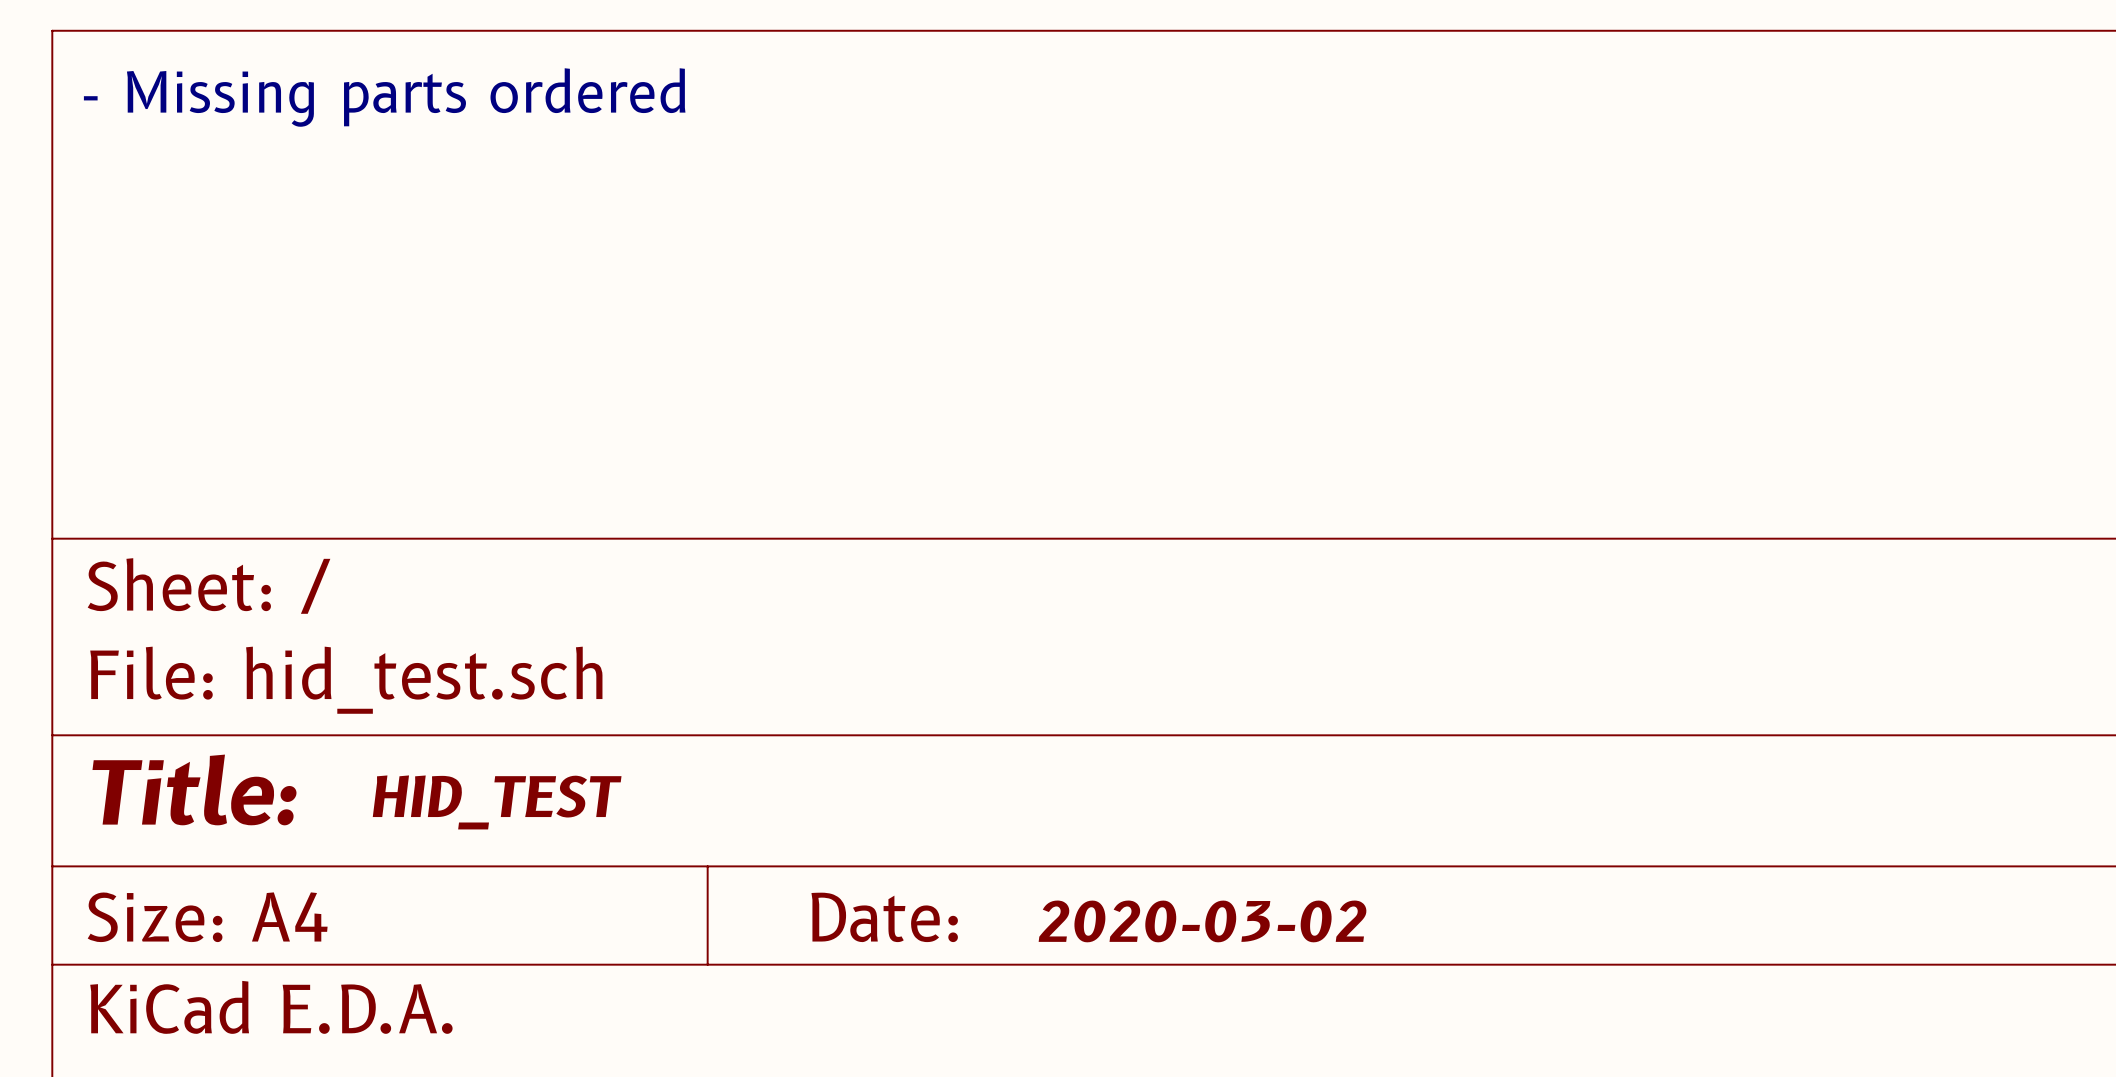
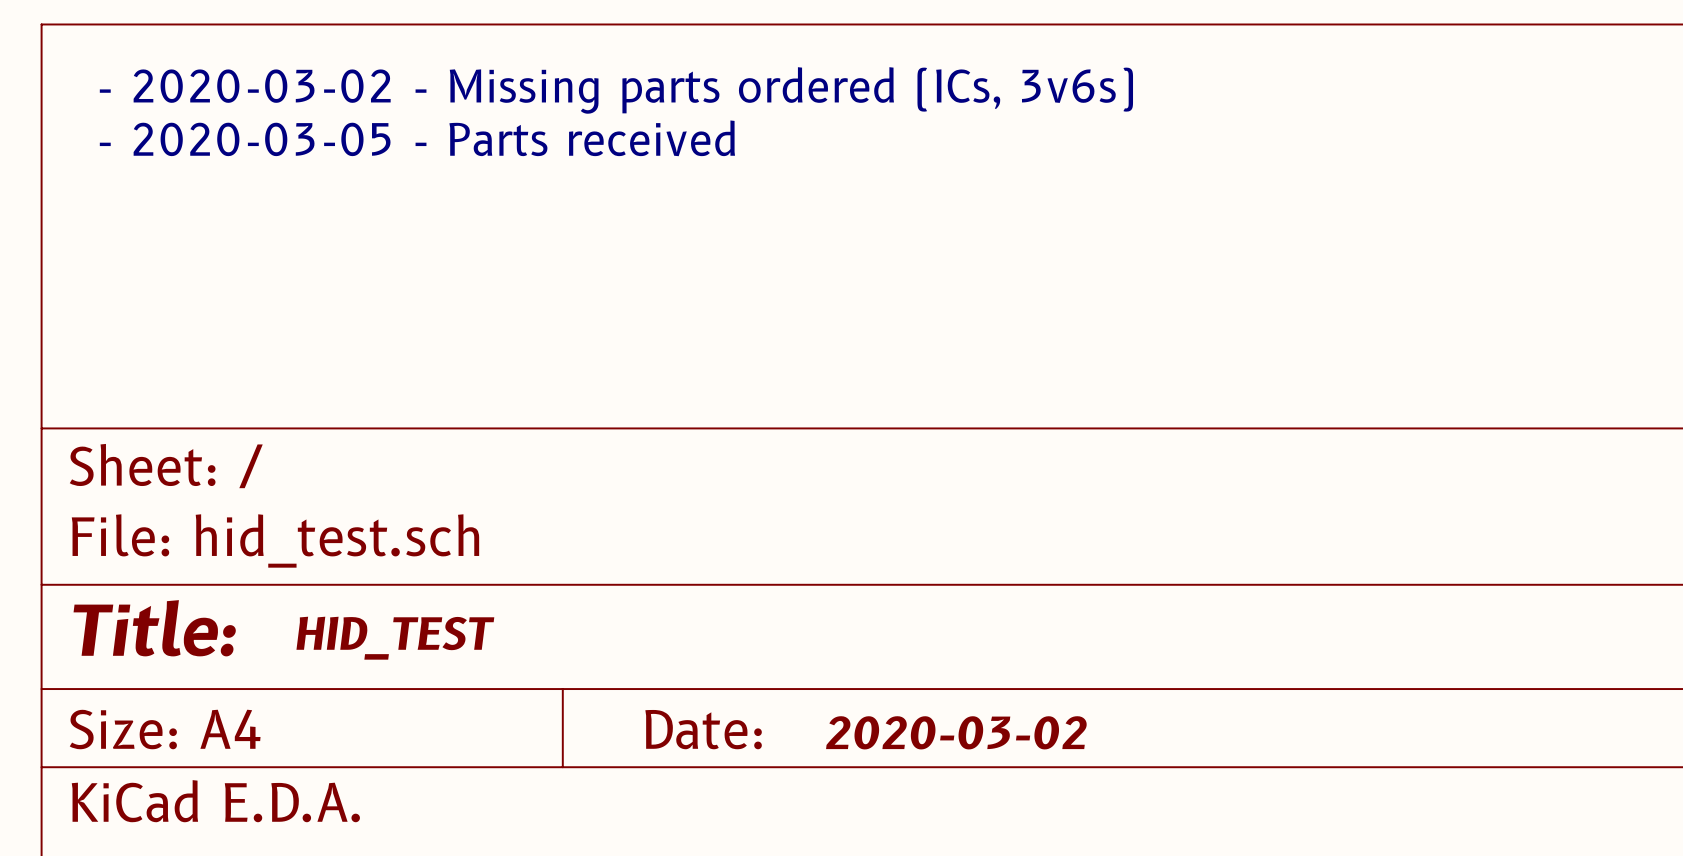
text: - Missing parts ordered (384, 97) -> - 2020-03-02 - Missing parts ordered (ICs, 3v6s) (616, 90)
text: none -> - 2020-03-05 - Parts received (417, 138)

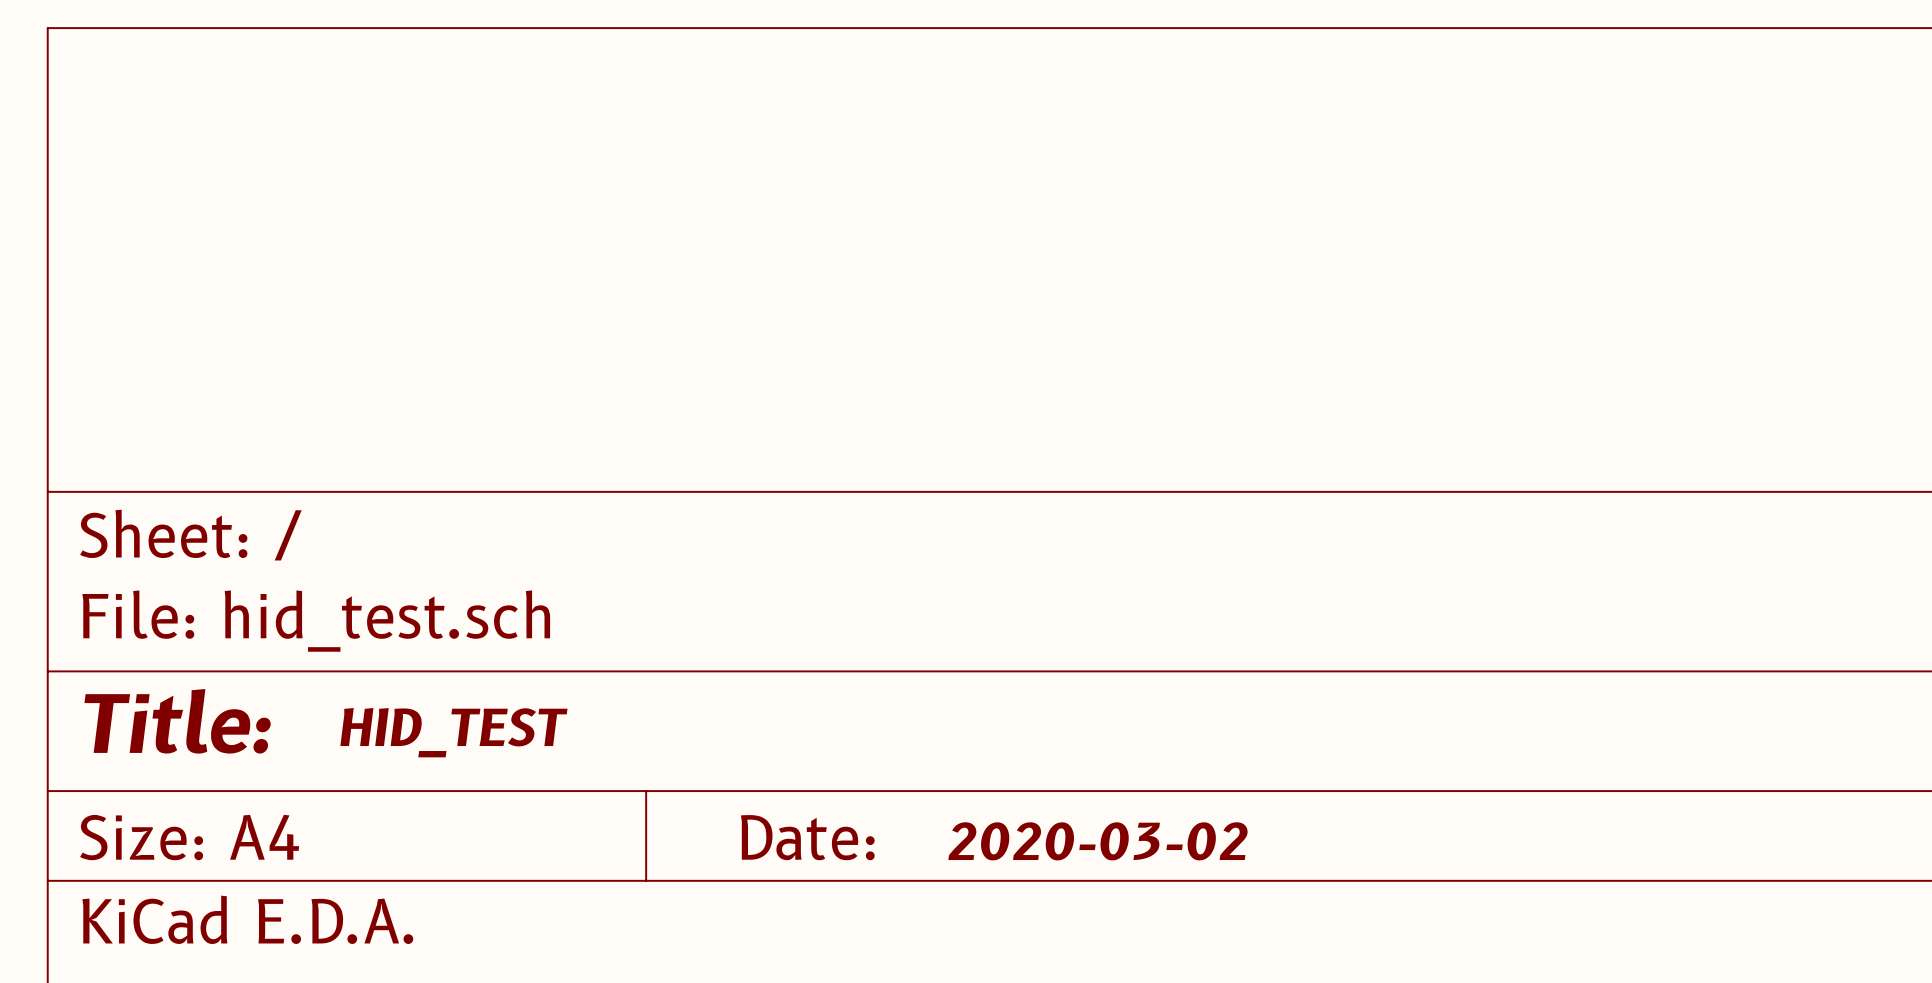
text: - 2020-03-02 - Missing parts ordered (ICs, 3v6s) (616, 90) -> none
text: - 2020-03-05 - Parts received (417, 138) -> none

